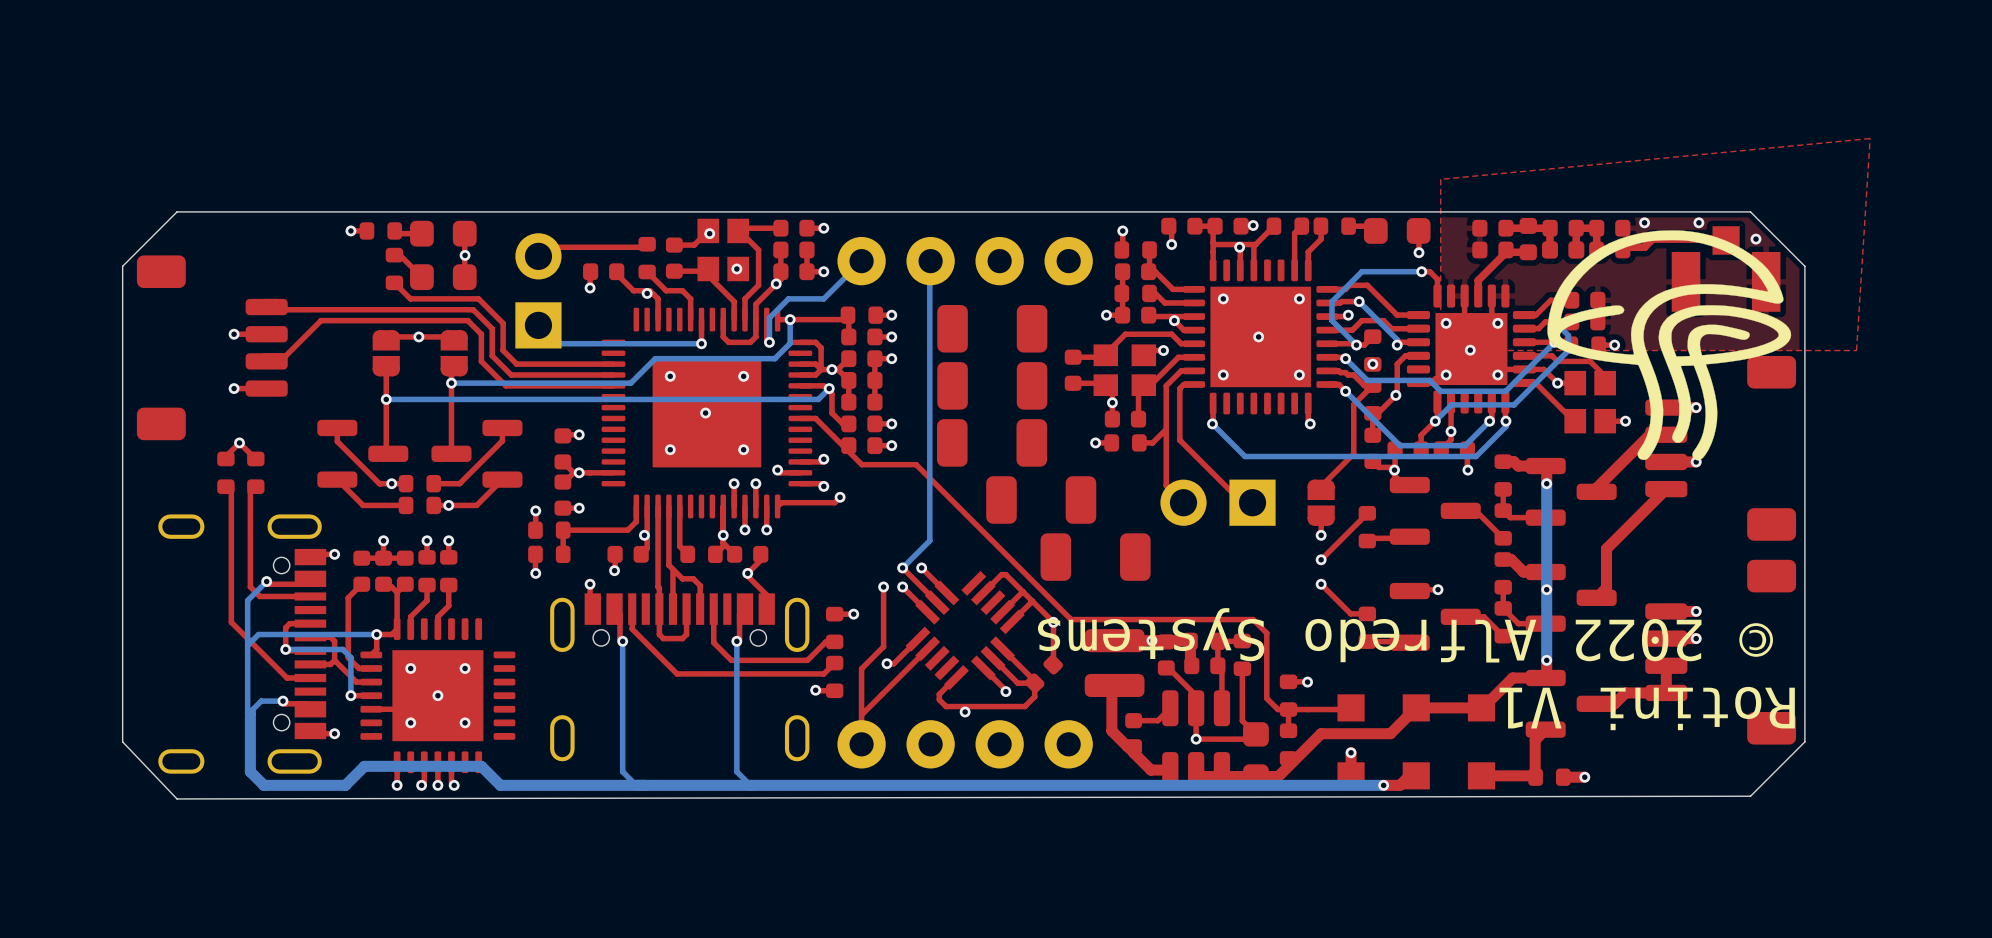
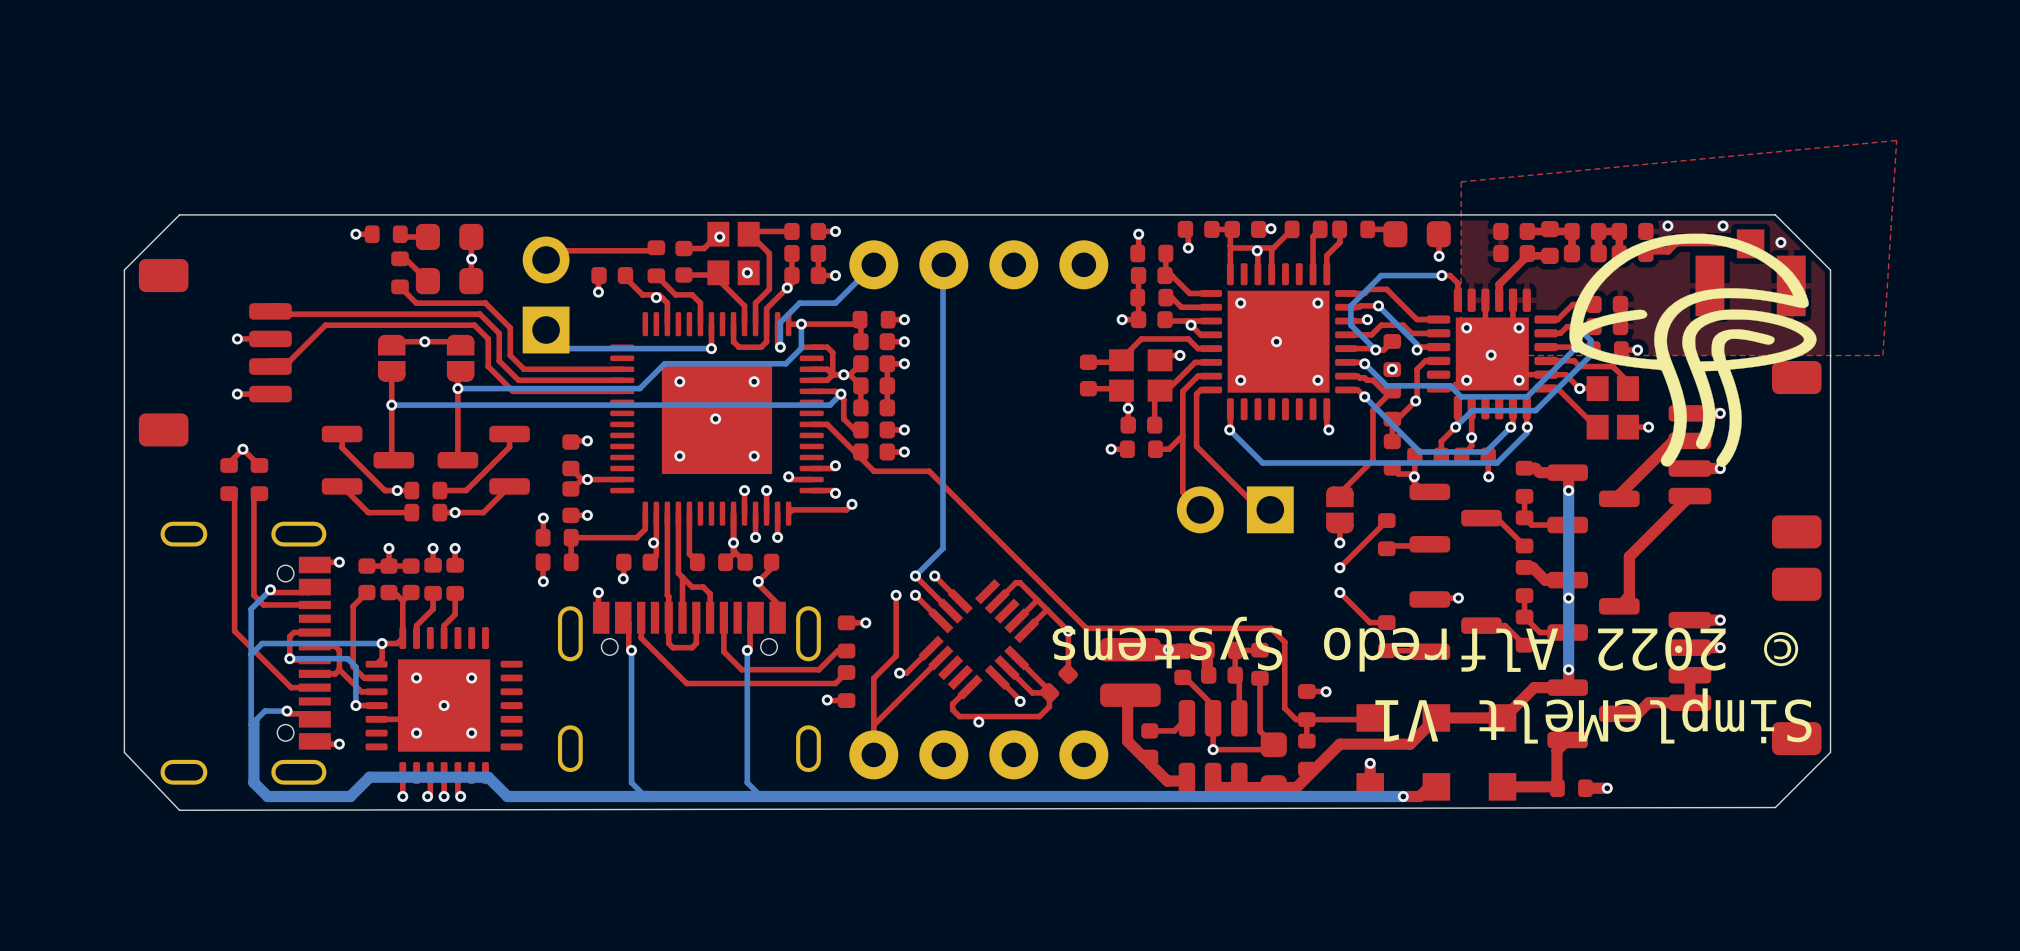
part: (992, 328) -> none
part: (992, 385) -> none
part: (992, 442) -> none
part: (1041, 500) -> none
part: (1095, 557) -> none
text: none -> SimpleMelt V1 (1593, 716)
text: Rotini V1 (1647, 708) -> none

